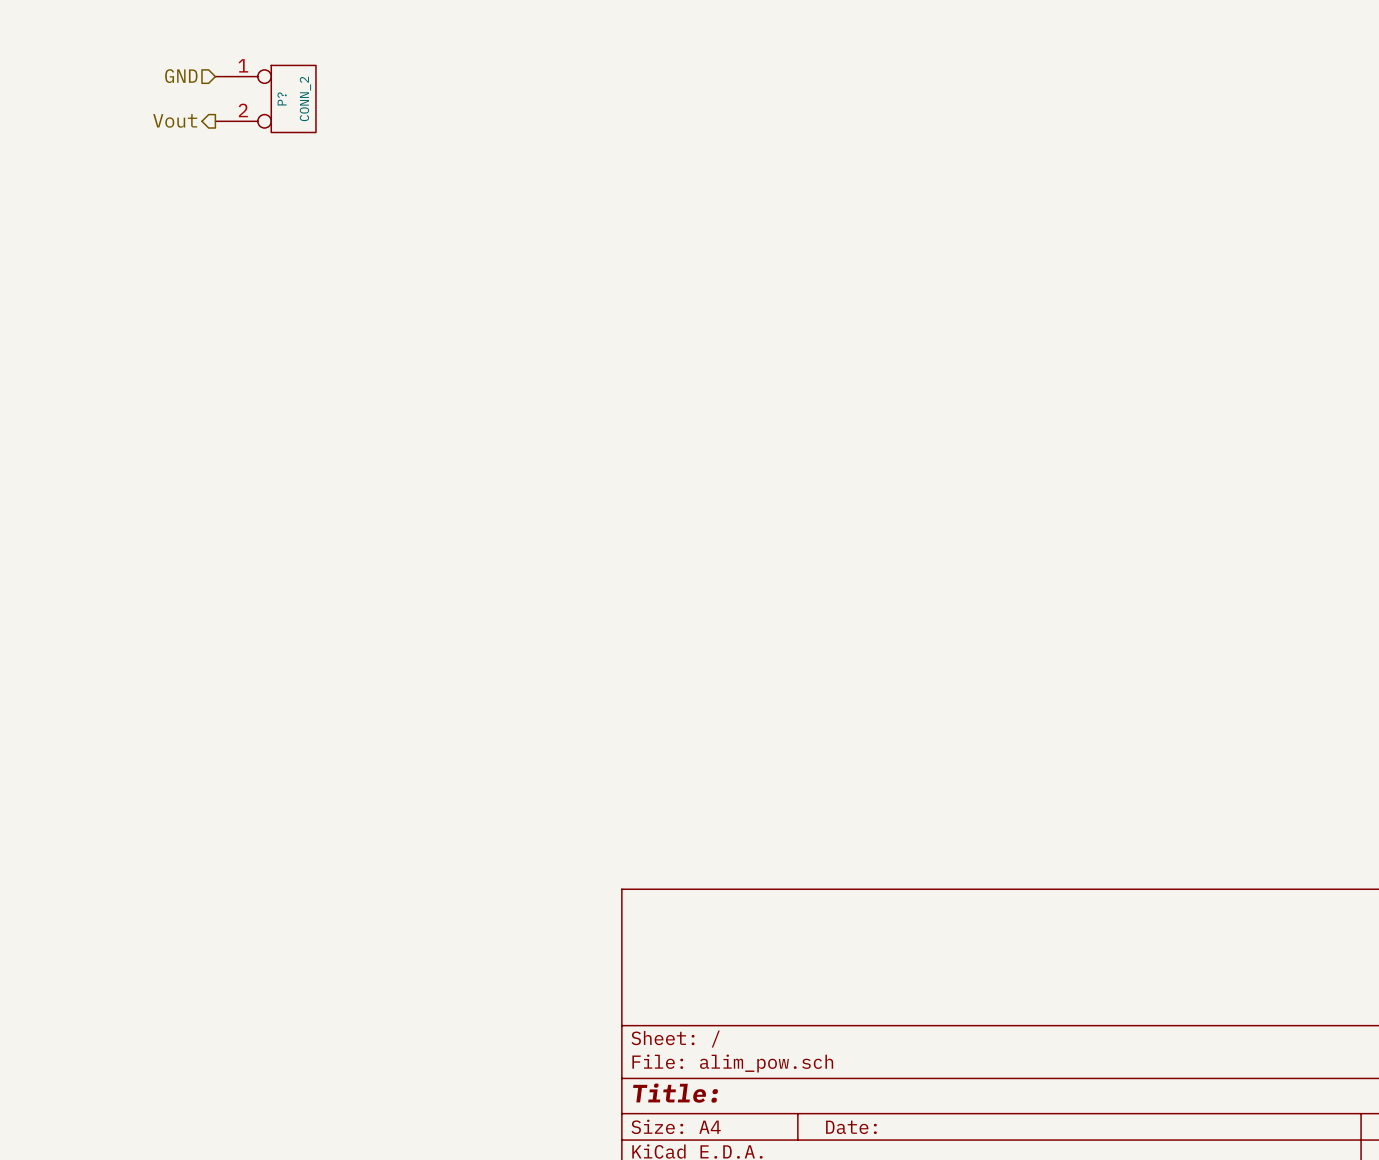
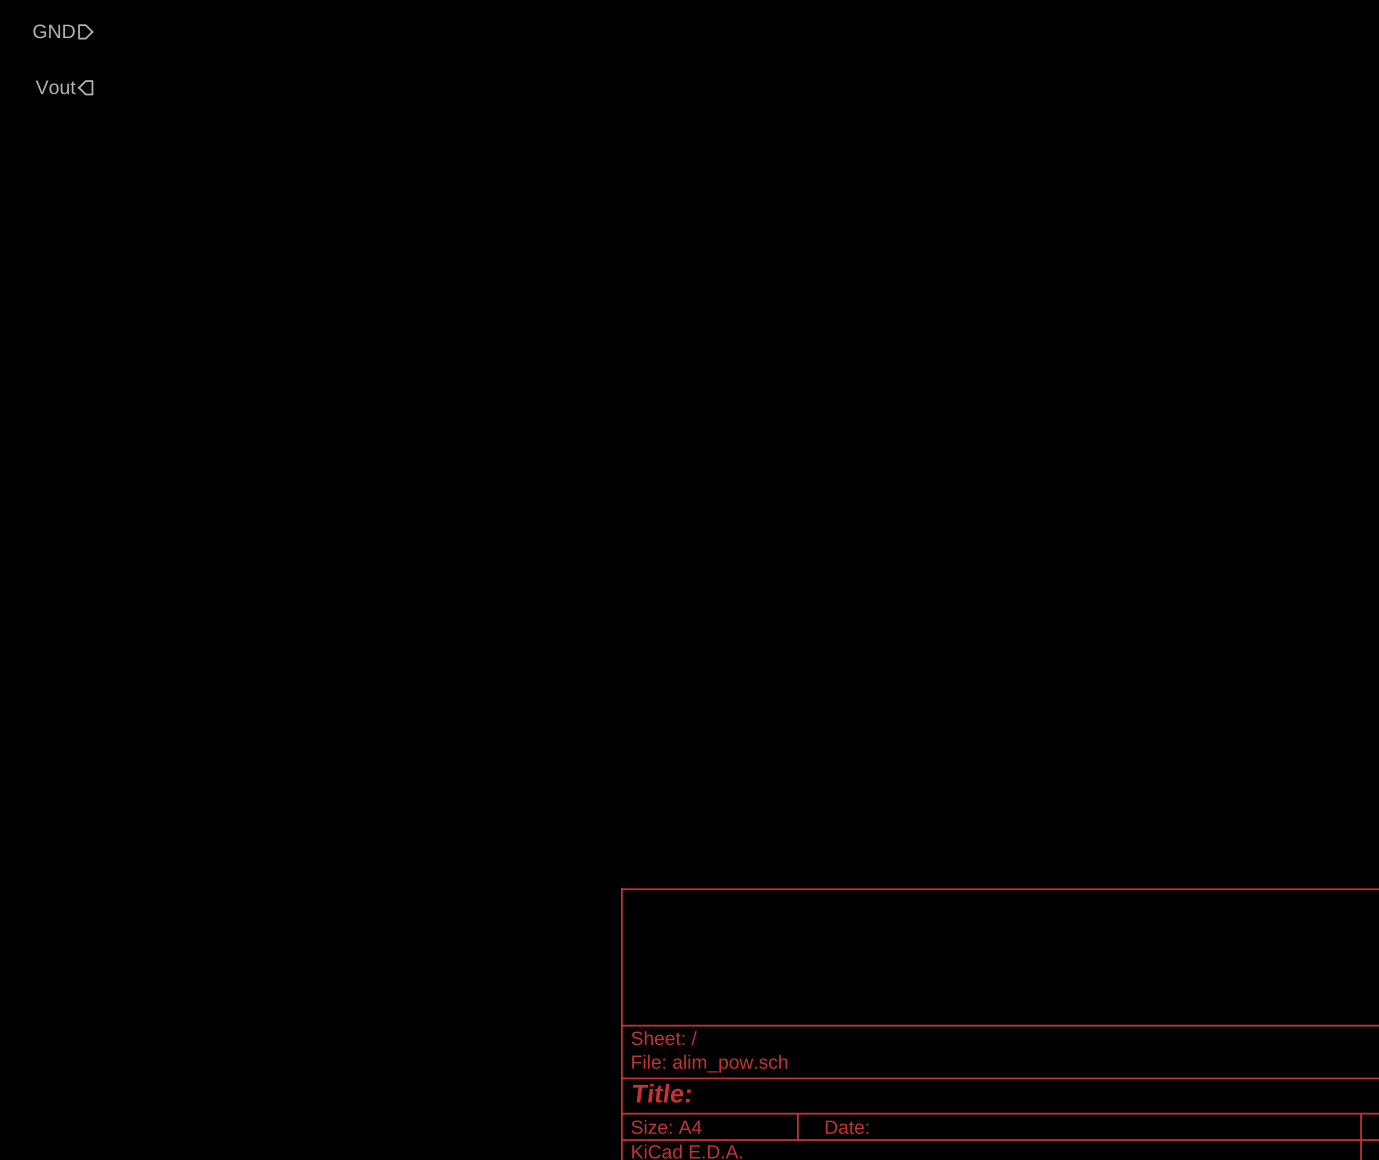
hierarchical label position: GND (181, 76) -> GND (54, 31)
P?: CONN_2 (265, 98) -> none
hierarchical label position: Vout (175, 120) -> Vout (55, 87)

